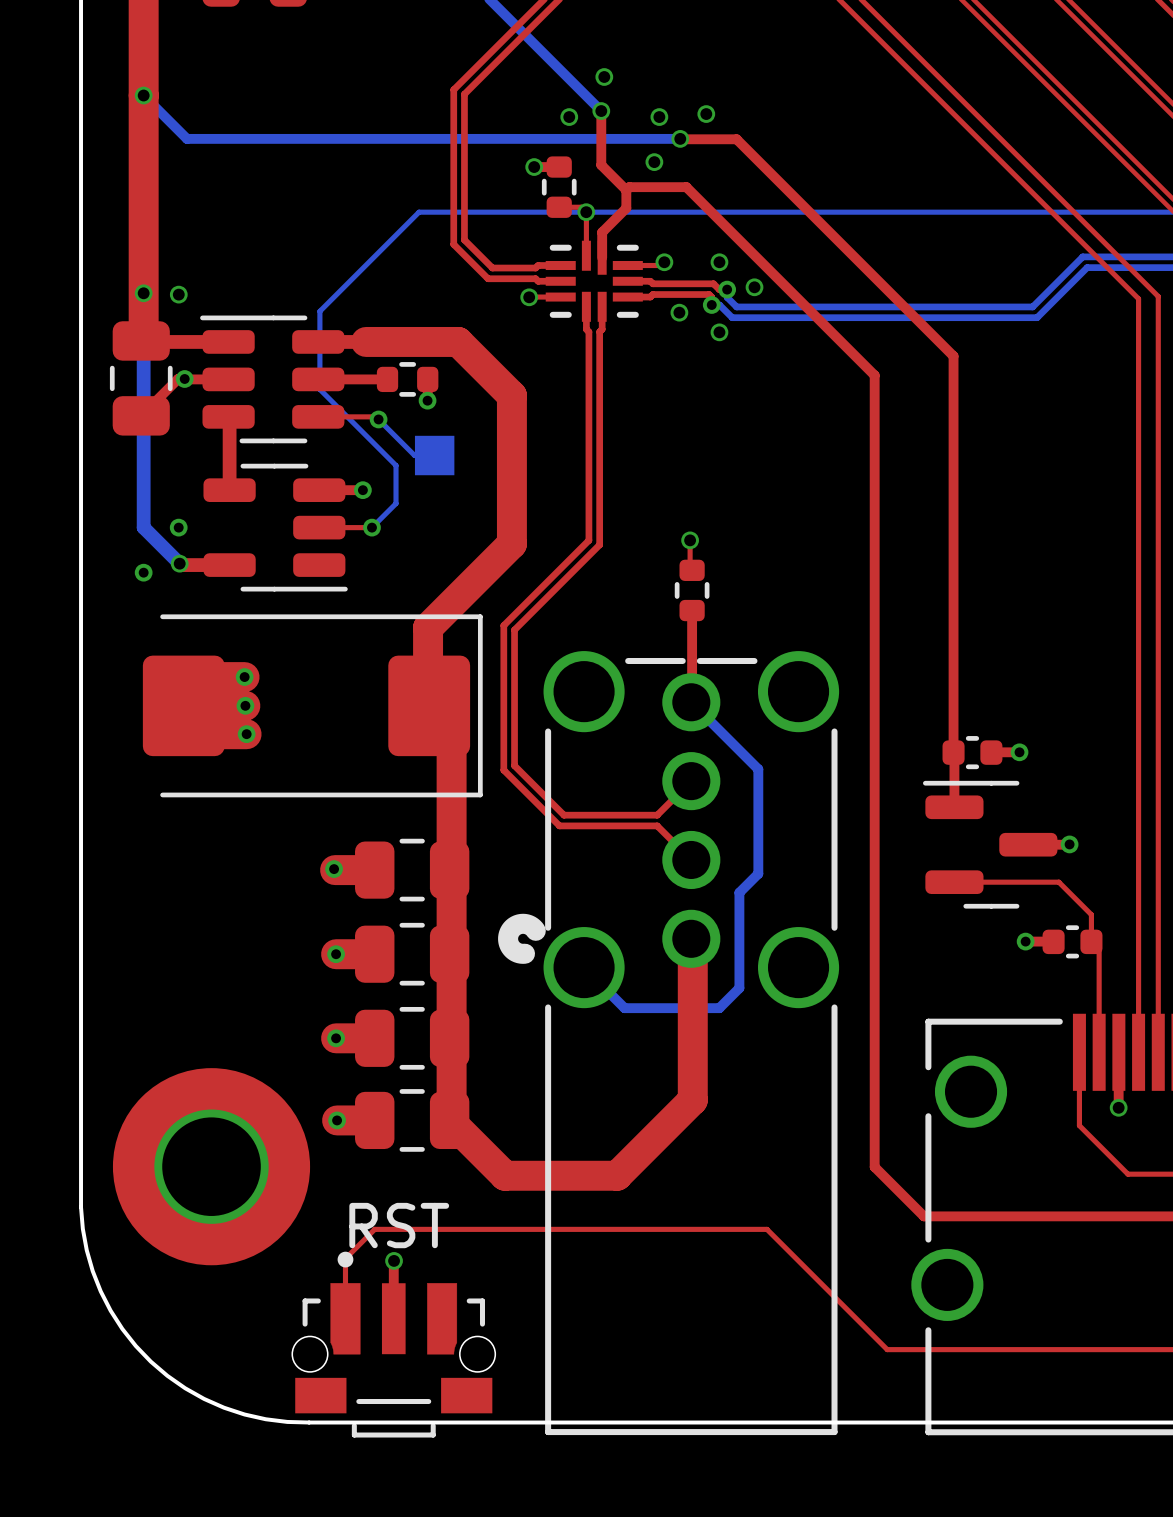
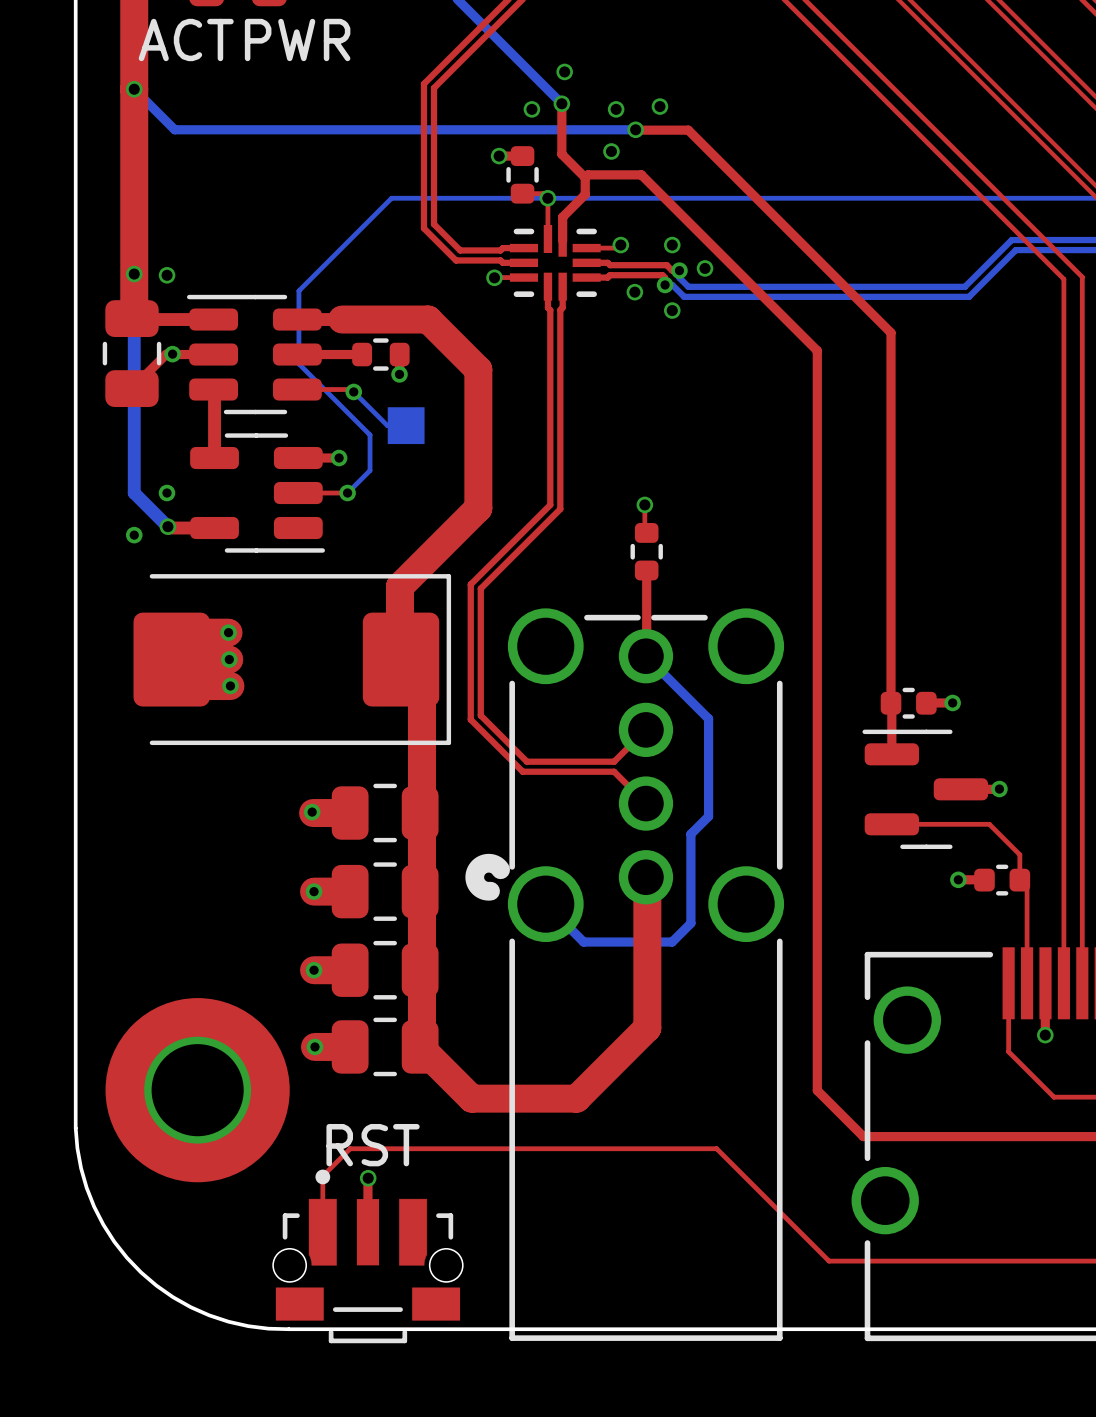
part text: none -> ACT (186, 39)
part text: none -> PWR (297, 39)

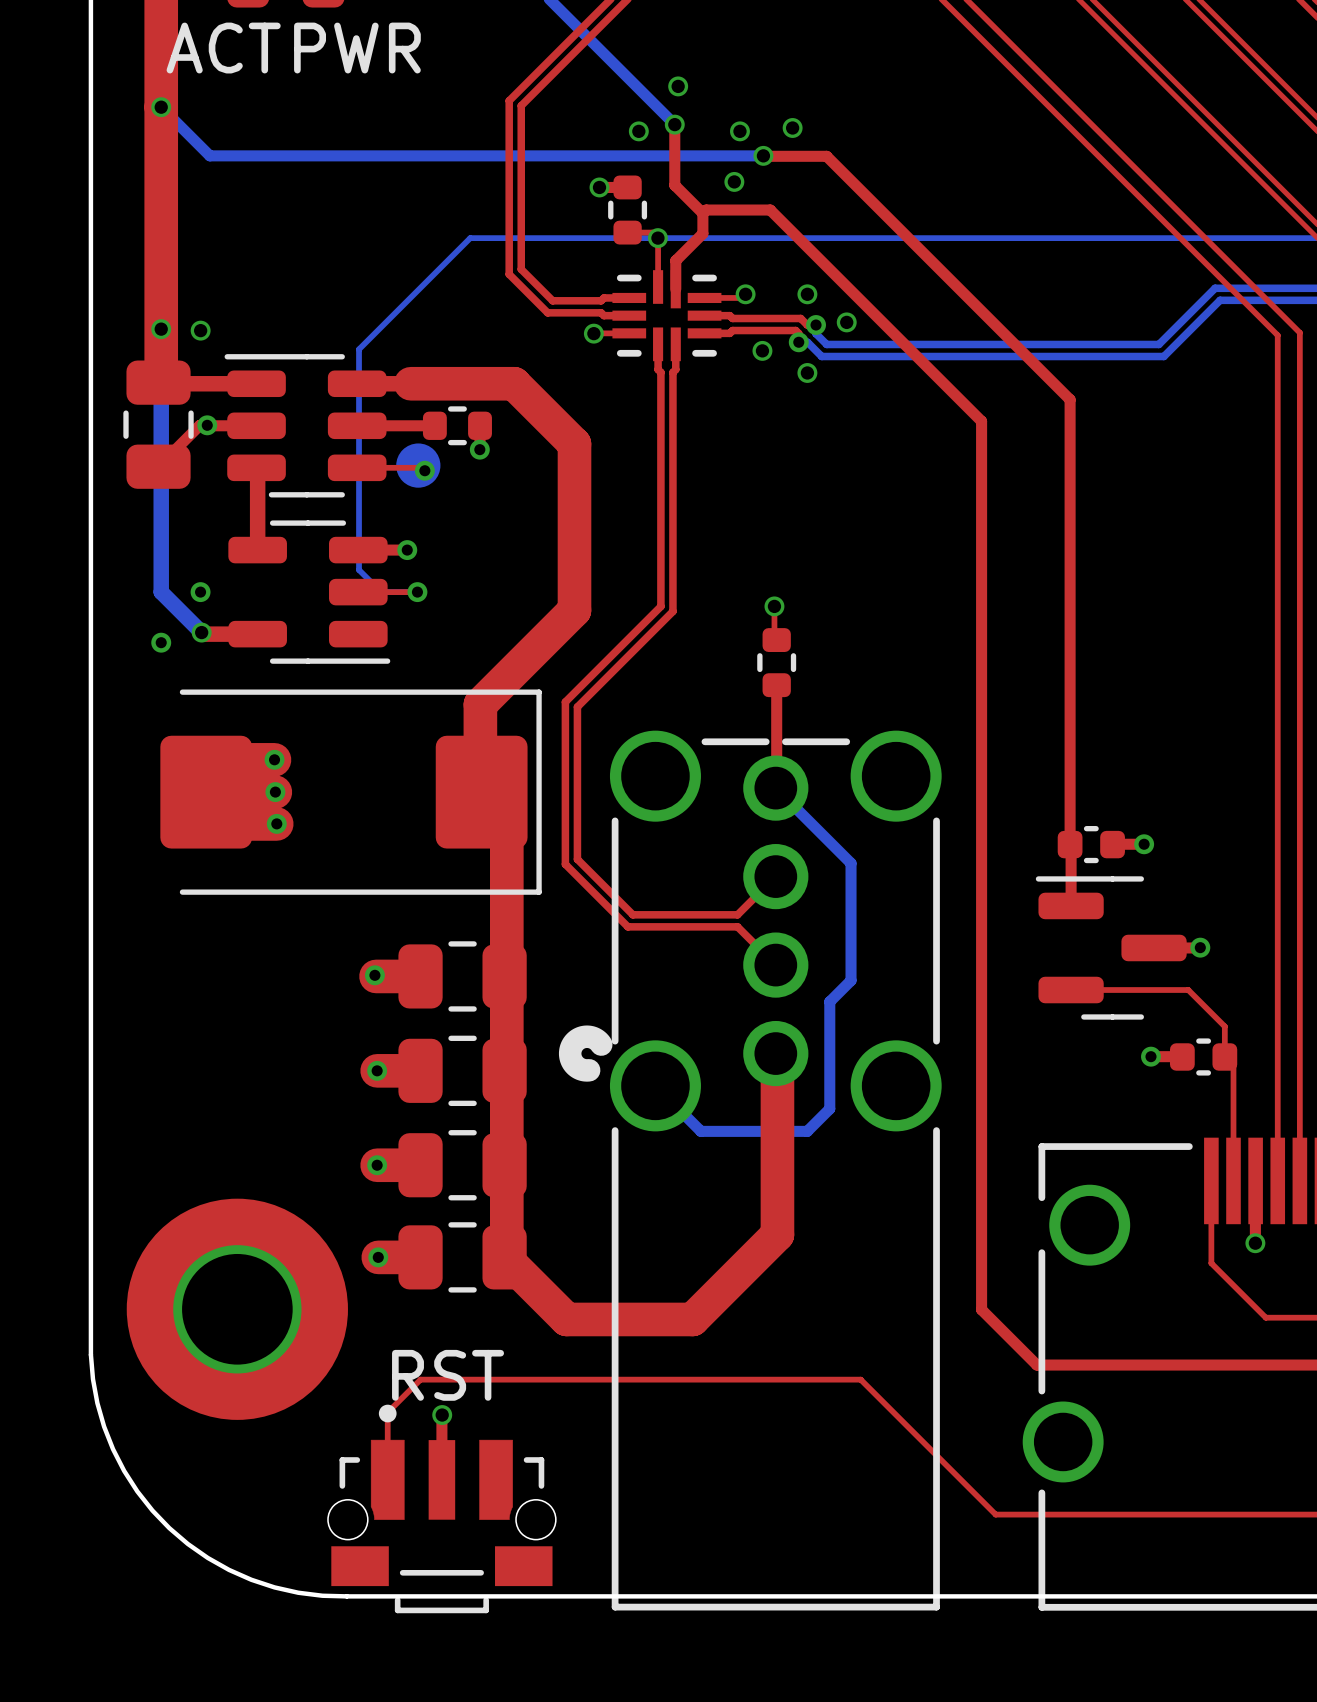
bottom track: (298, 363) (370, 435) (370, 470) (347, 493) -> (359, 437) (359, 569) (381, 592) (417, 592)
part: none -> (418, 465)
bottom track: (353, 391) (387, 425) (406, 425) -> none
part: (406, 425) -> none

